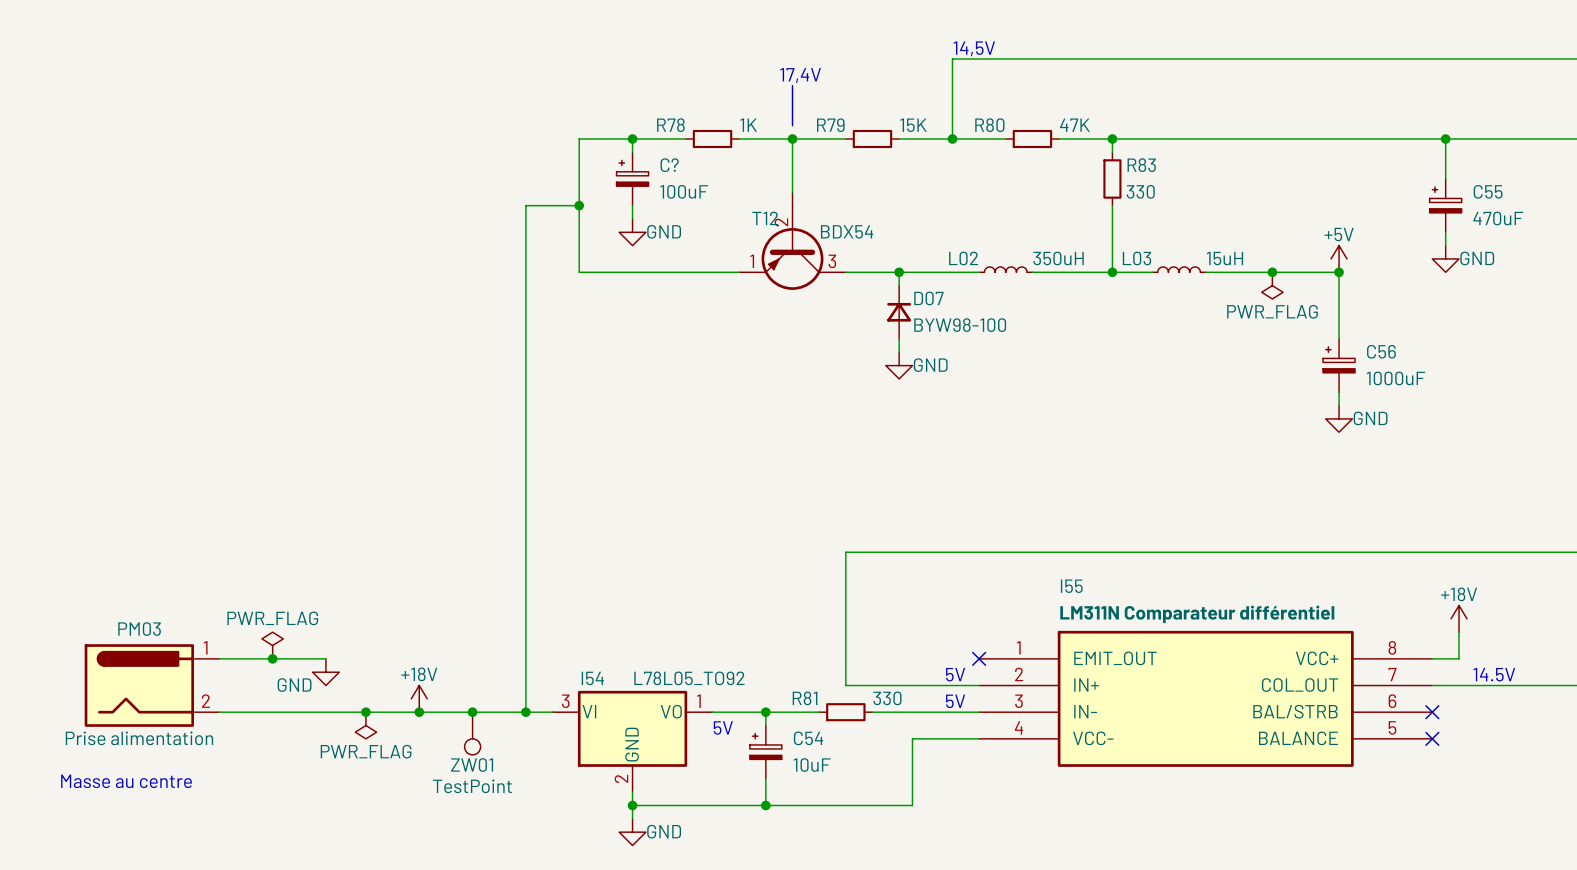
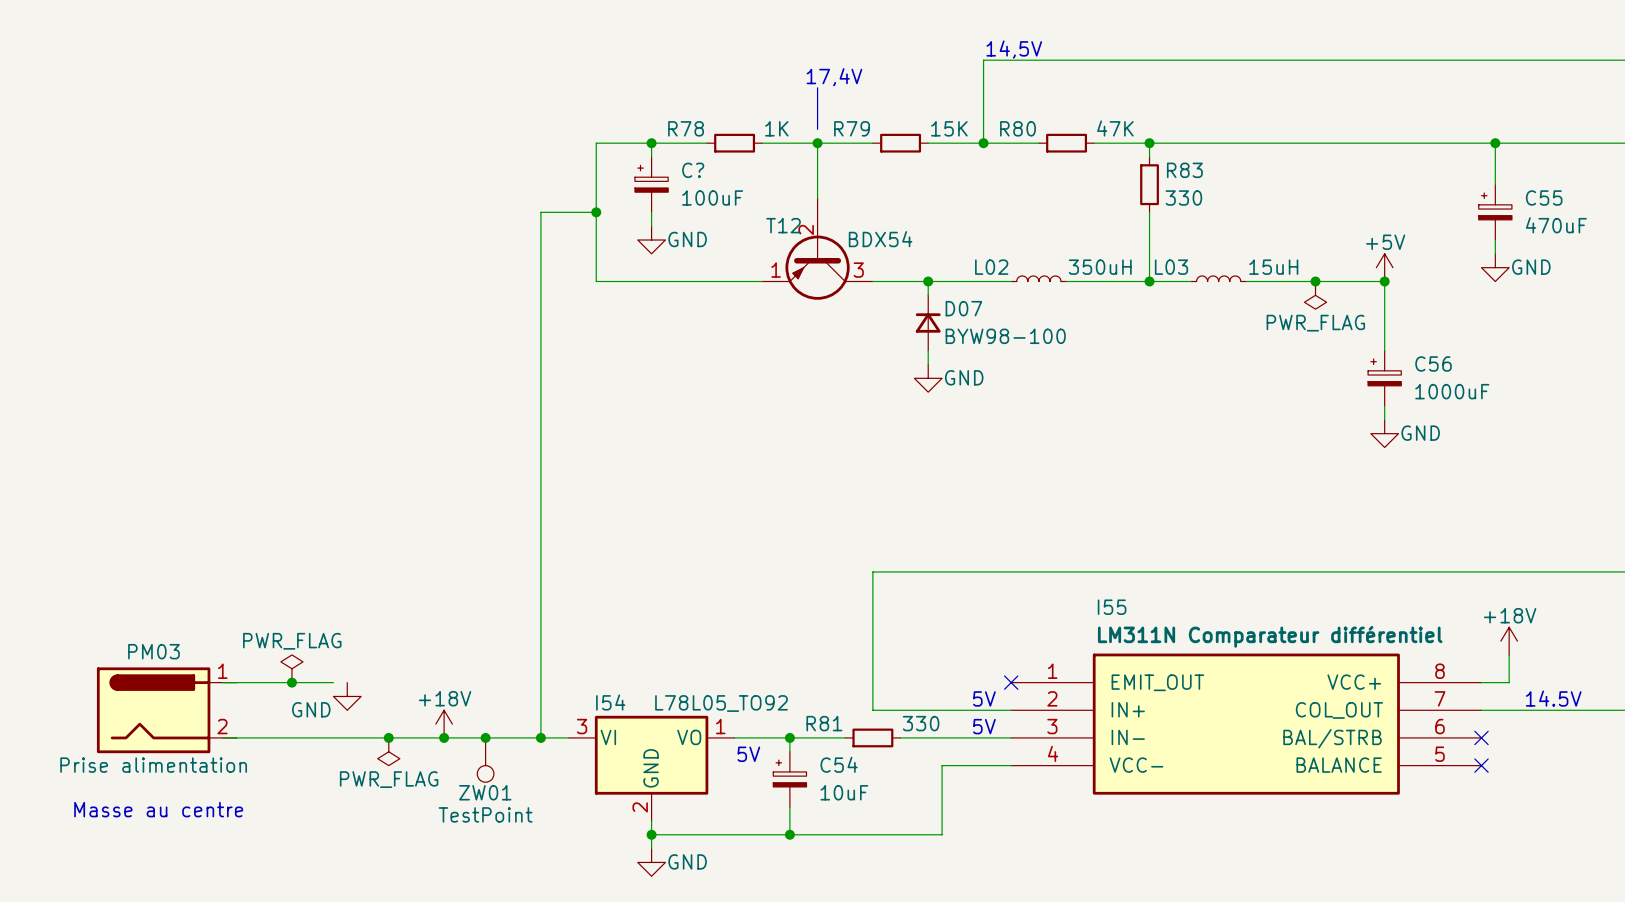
power symbol position: PWR_FLAG (272, 645) -> PWR_FLAG (291, 668)
junction position: (272, 658) -> (291, 682)
power symbol position: GND (325, 672) -> GND (347, 696)
PM03 position: (151, 685) -> (166, 710)
power symbol position: +18V (419, 698) -> +18V (444, 724)
junction position: (365, 712) -> (388, 737)
junction position: (419, 712) -> (444, 737)
power symbol position: PWR_FLAG (365, 725) -> PWR_FLAG (388, 751)
text position: Masse au centre (126, 781) -> Masse au centre (158, 809)

